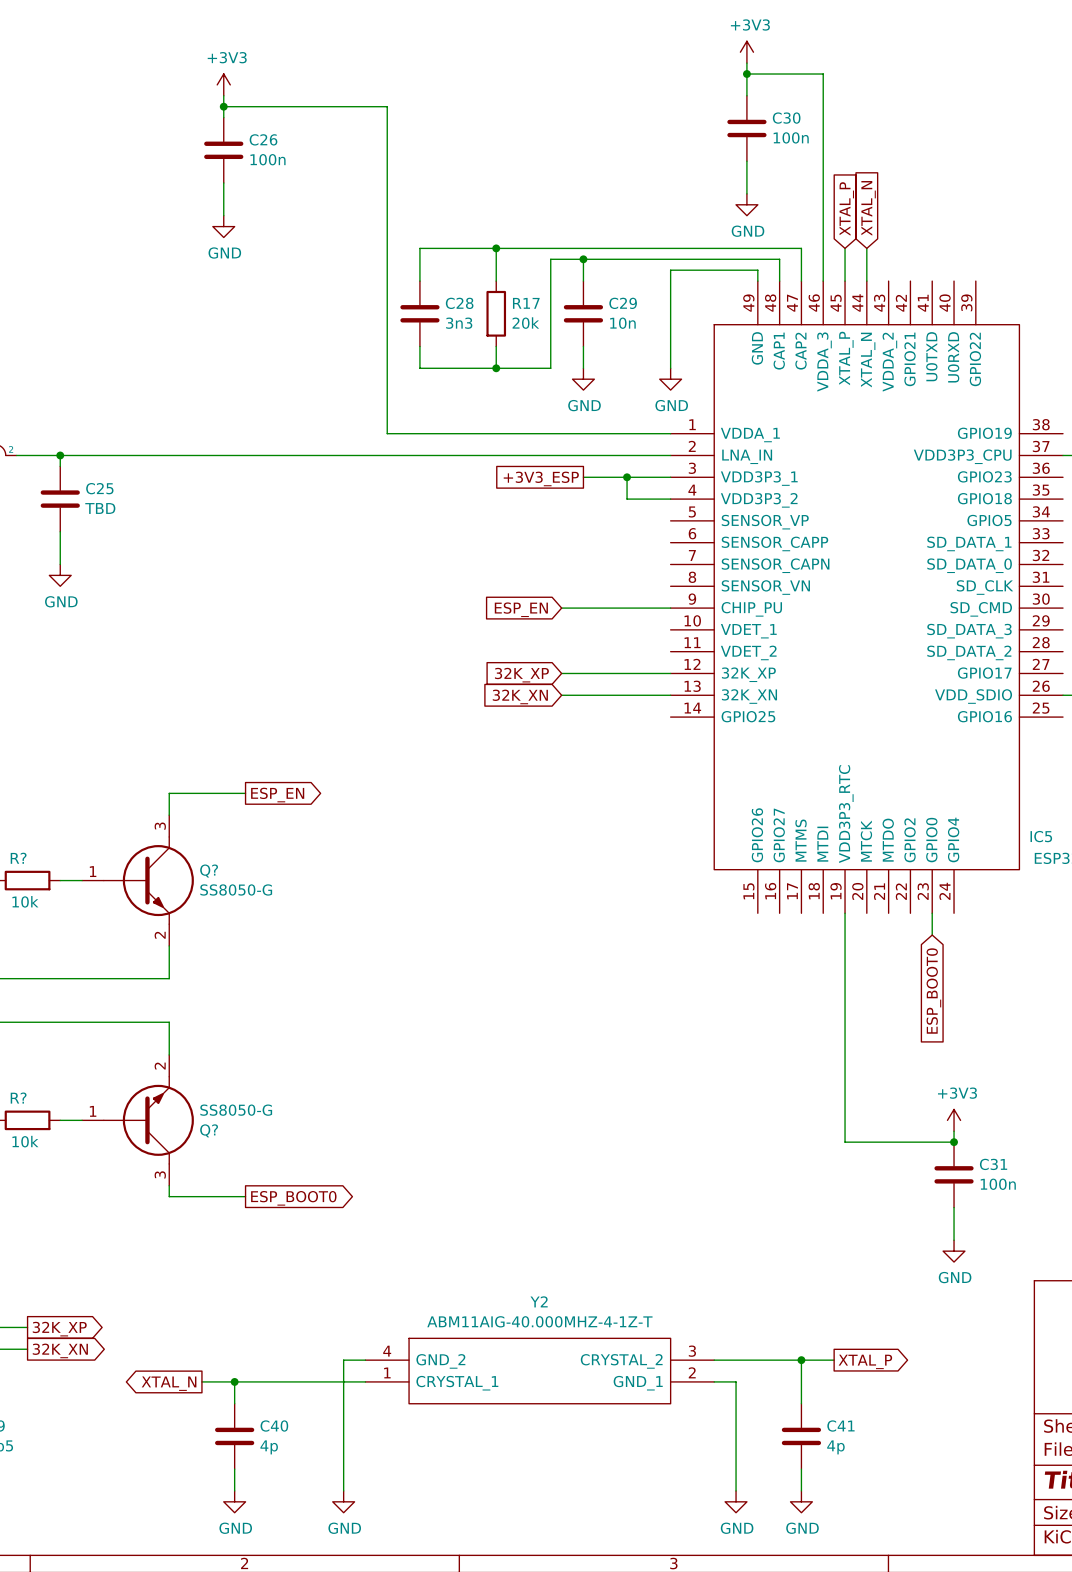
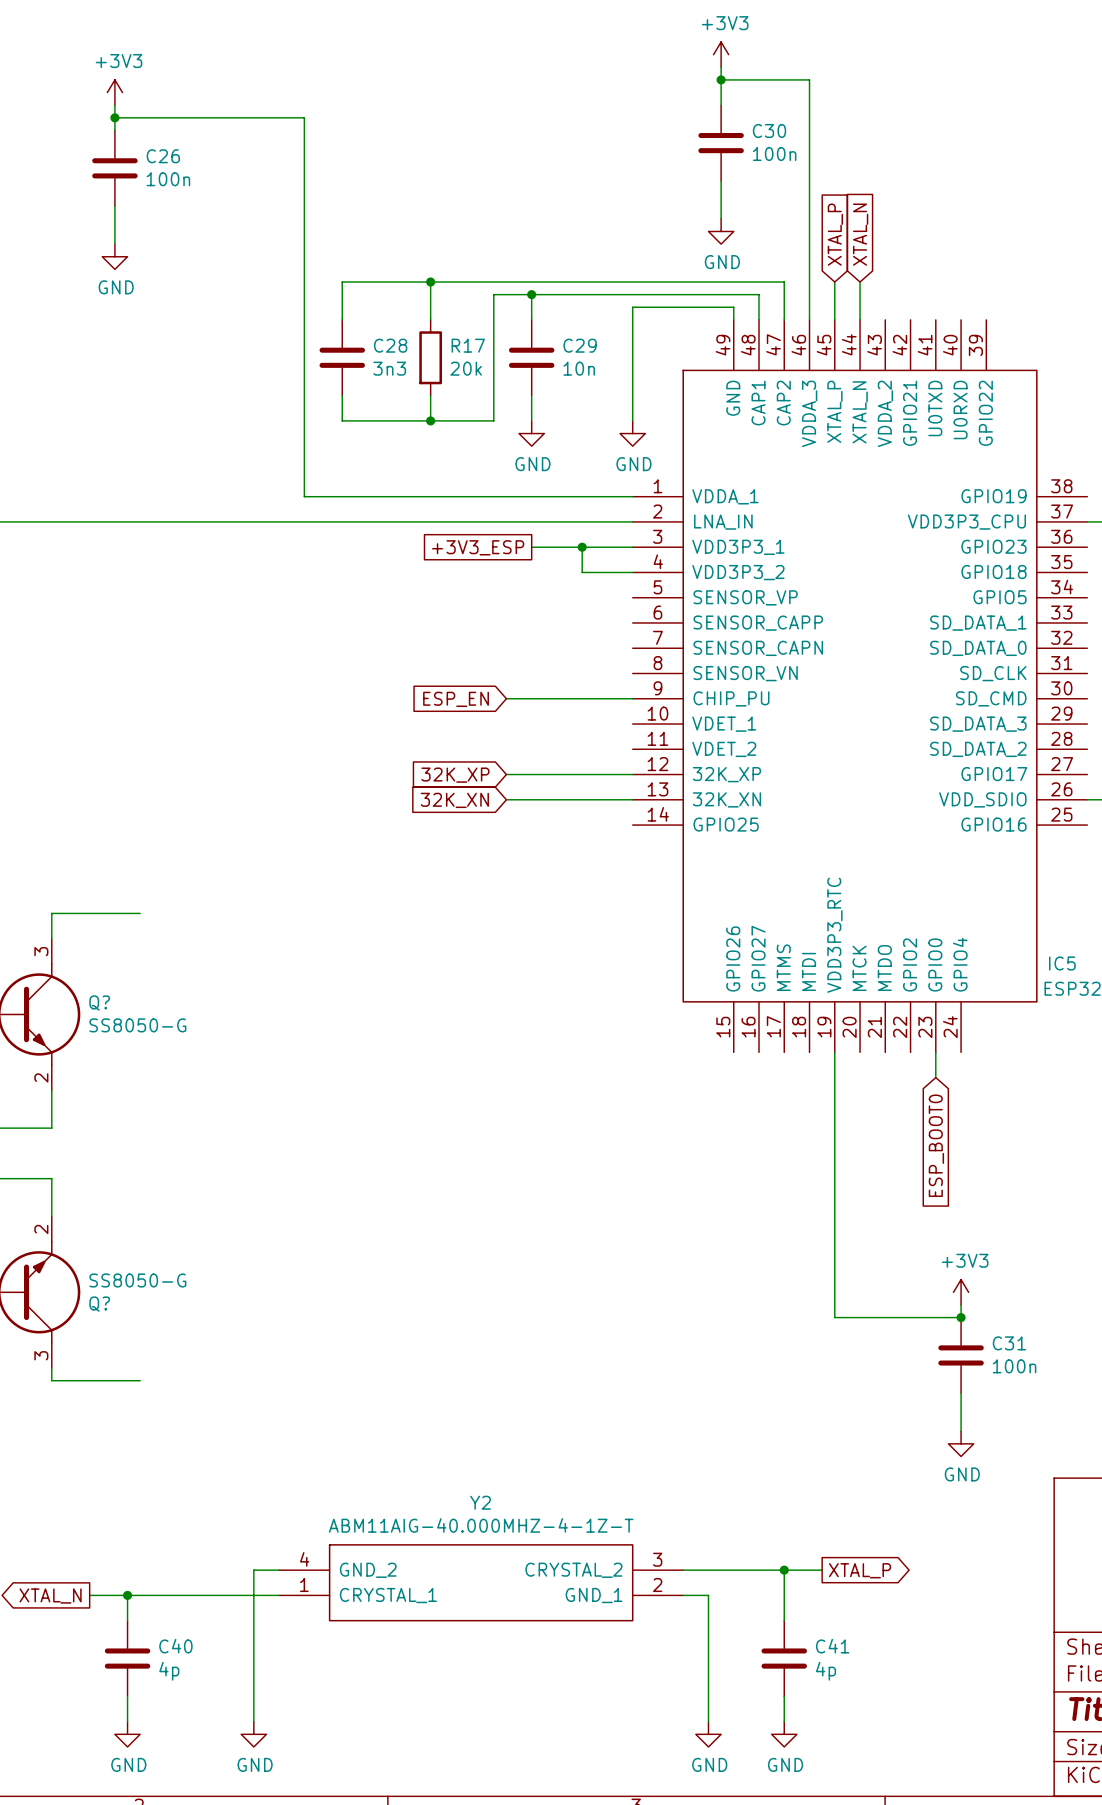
global label: ESP_EN (277, 795) -> none
global label: ESP_BOOT0 (293, 1198) -> none

